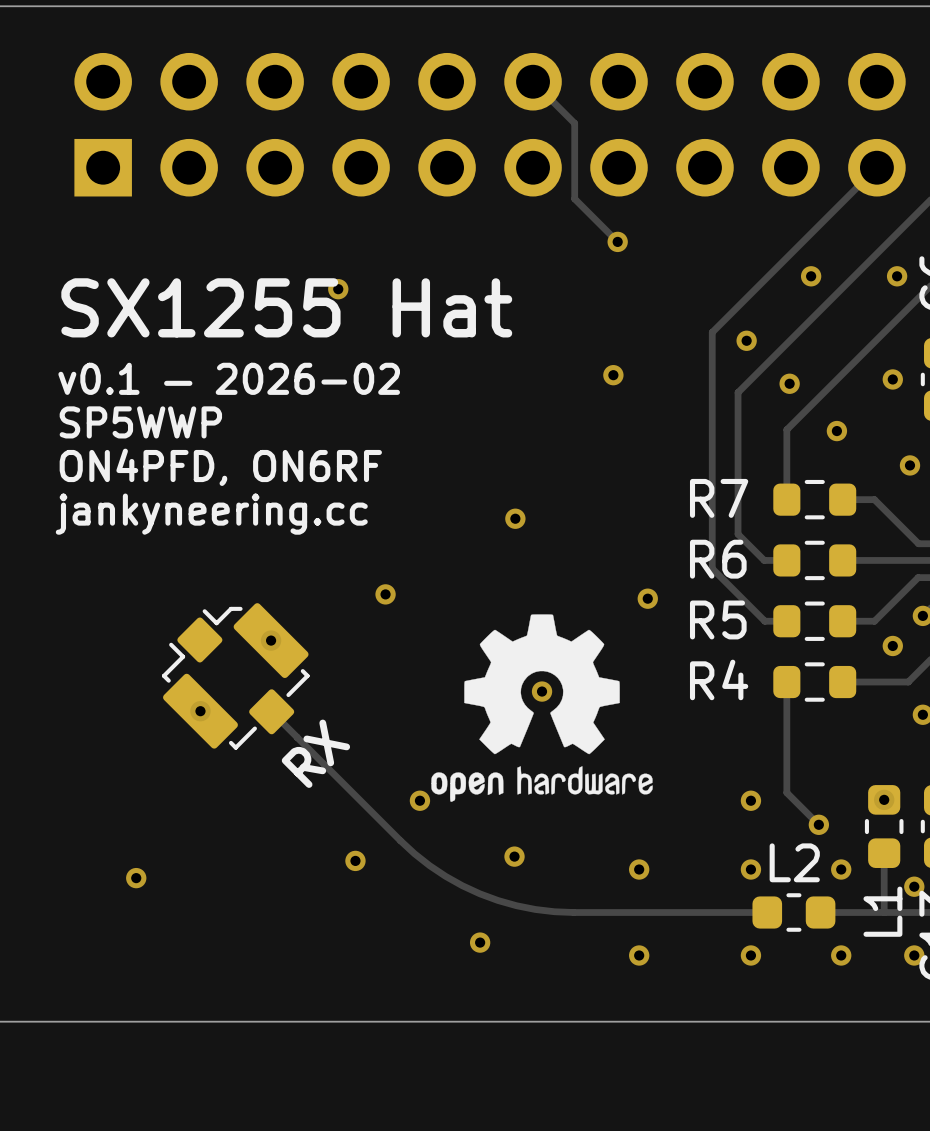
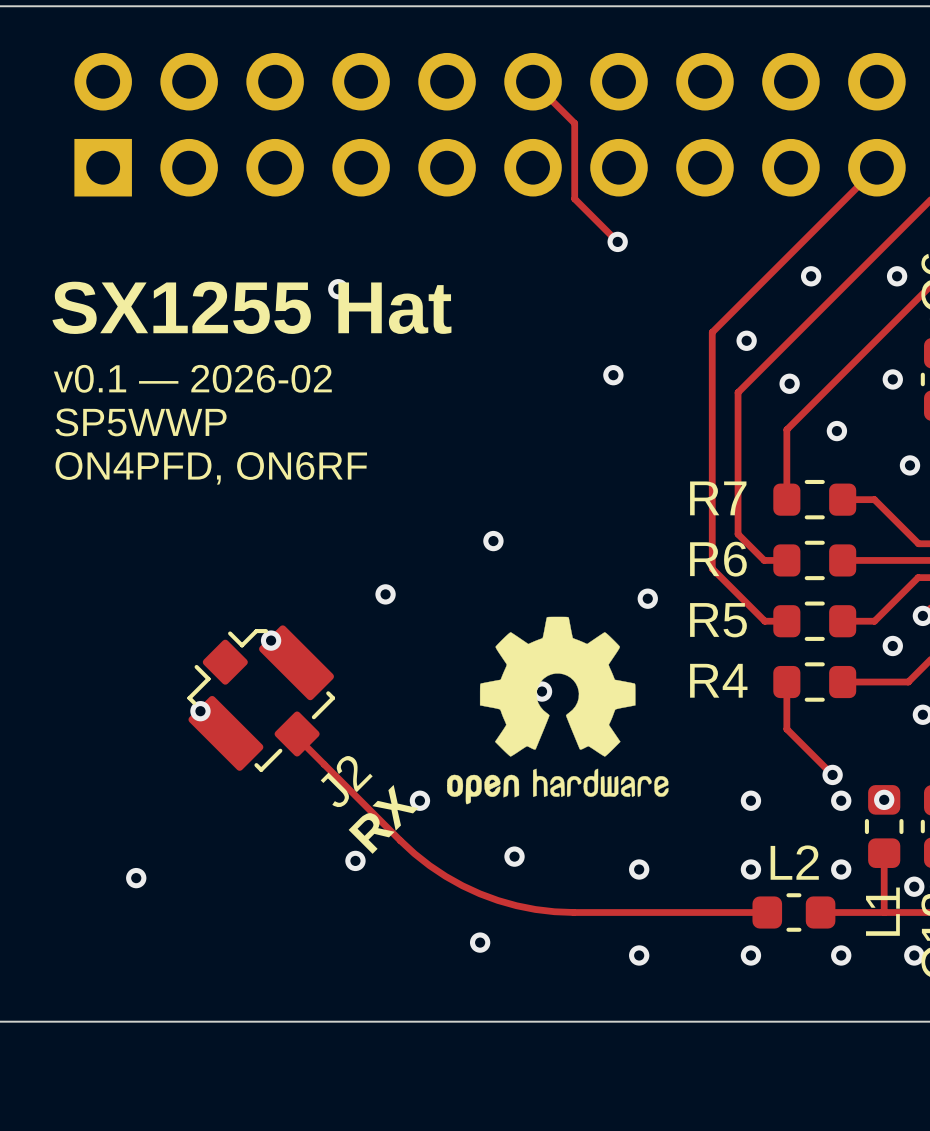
text: jankyneering.cc (211, 514) -> none
via position: (515, 518) -> (493, 541)
J2 position: (235, 676) -> (261, 698)
drawing position: (542, 708) -> (557, 710)
track: (786, 729) (786, 792) (818, 824) -> (786, 729) (832, 774)
text position: RX (315, 753) -> RX (383, 819)
via: none -> (832, 774)
J2 name: none -> J2 (346, 782)
via: none -> (841, 800)
via: (818, 824) -> none

